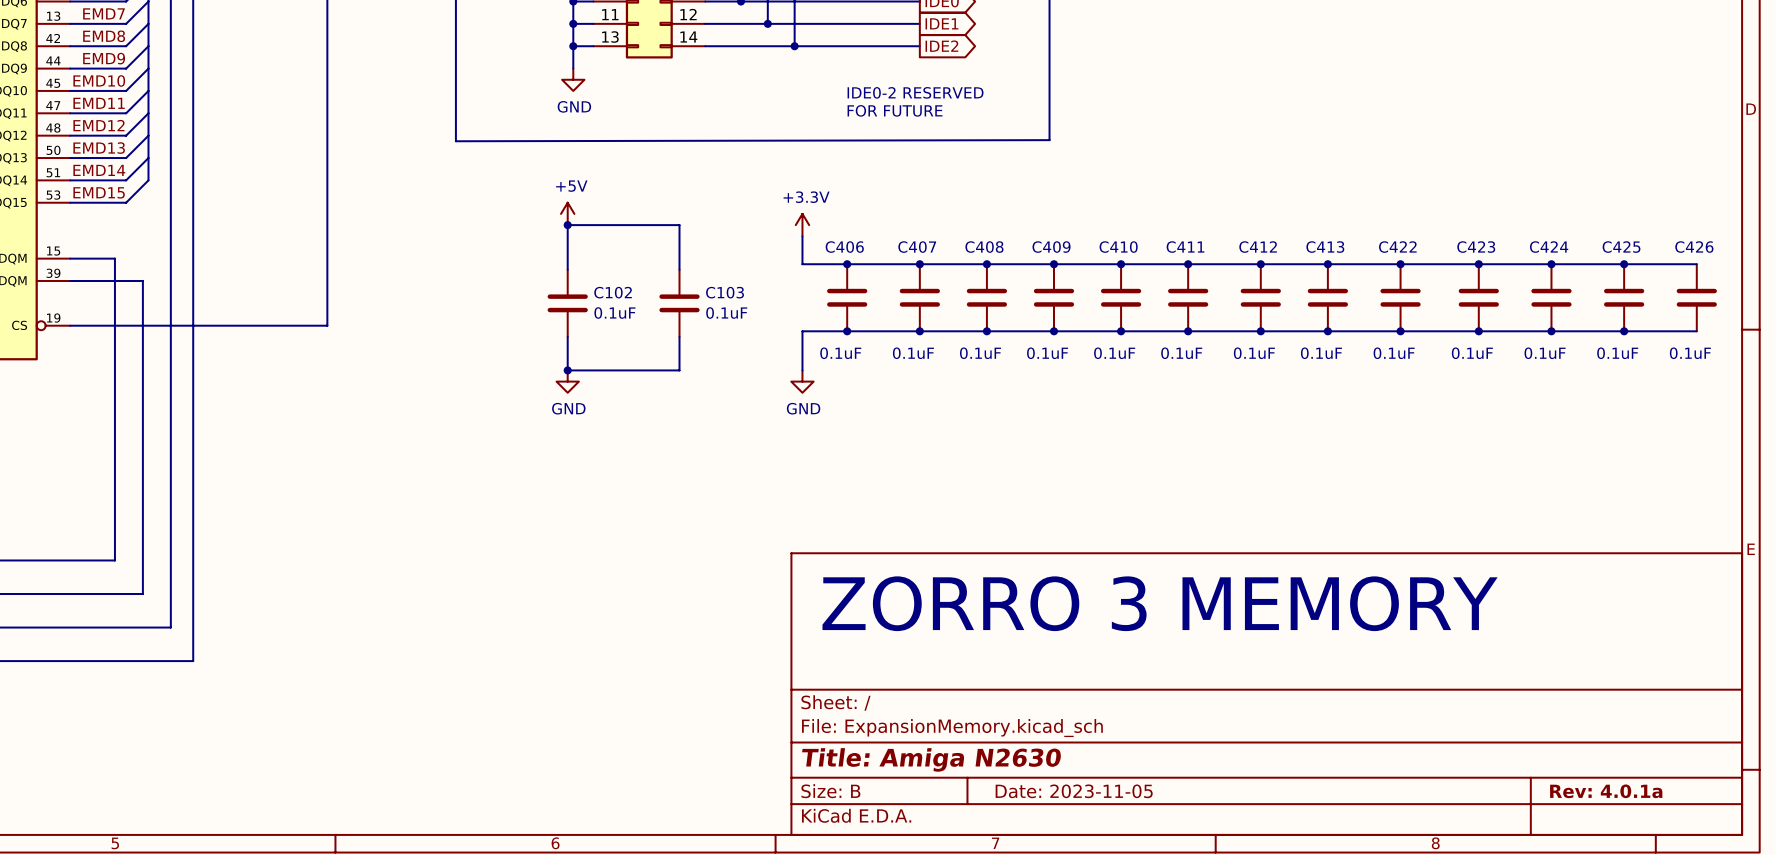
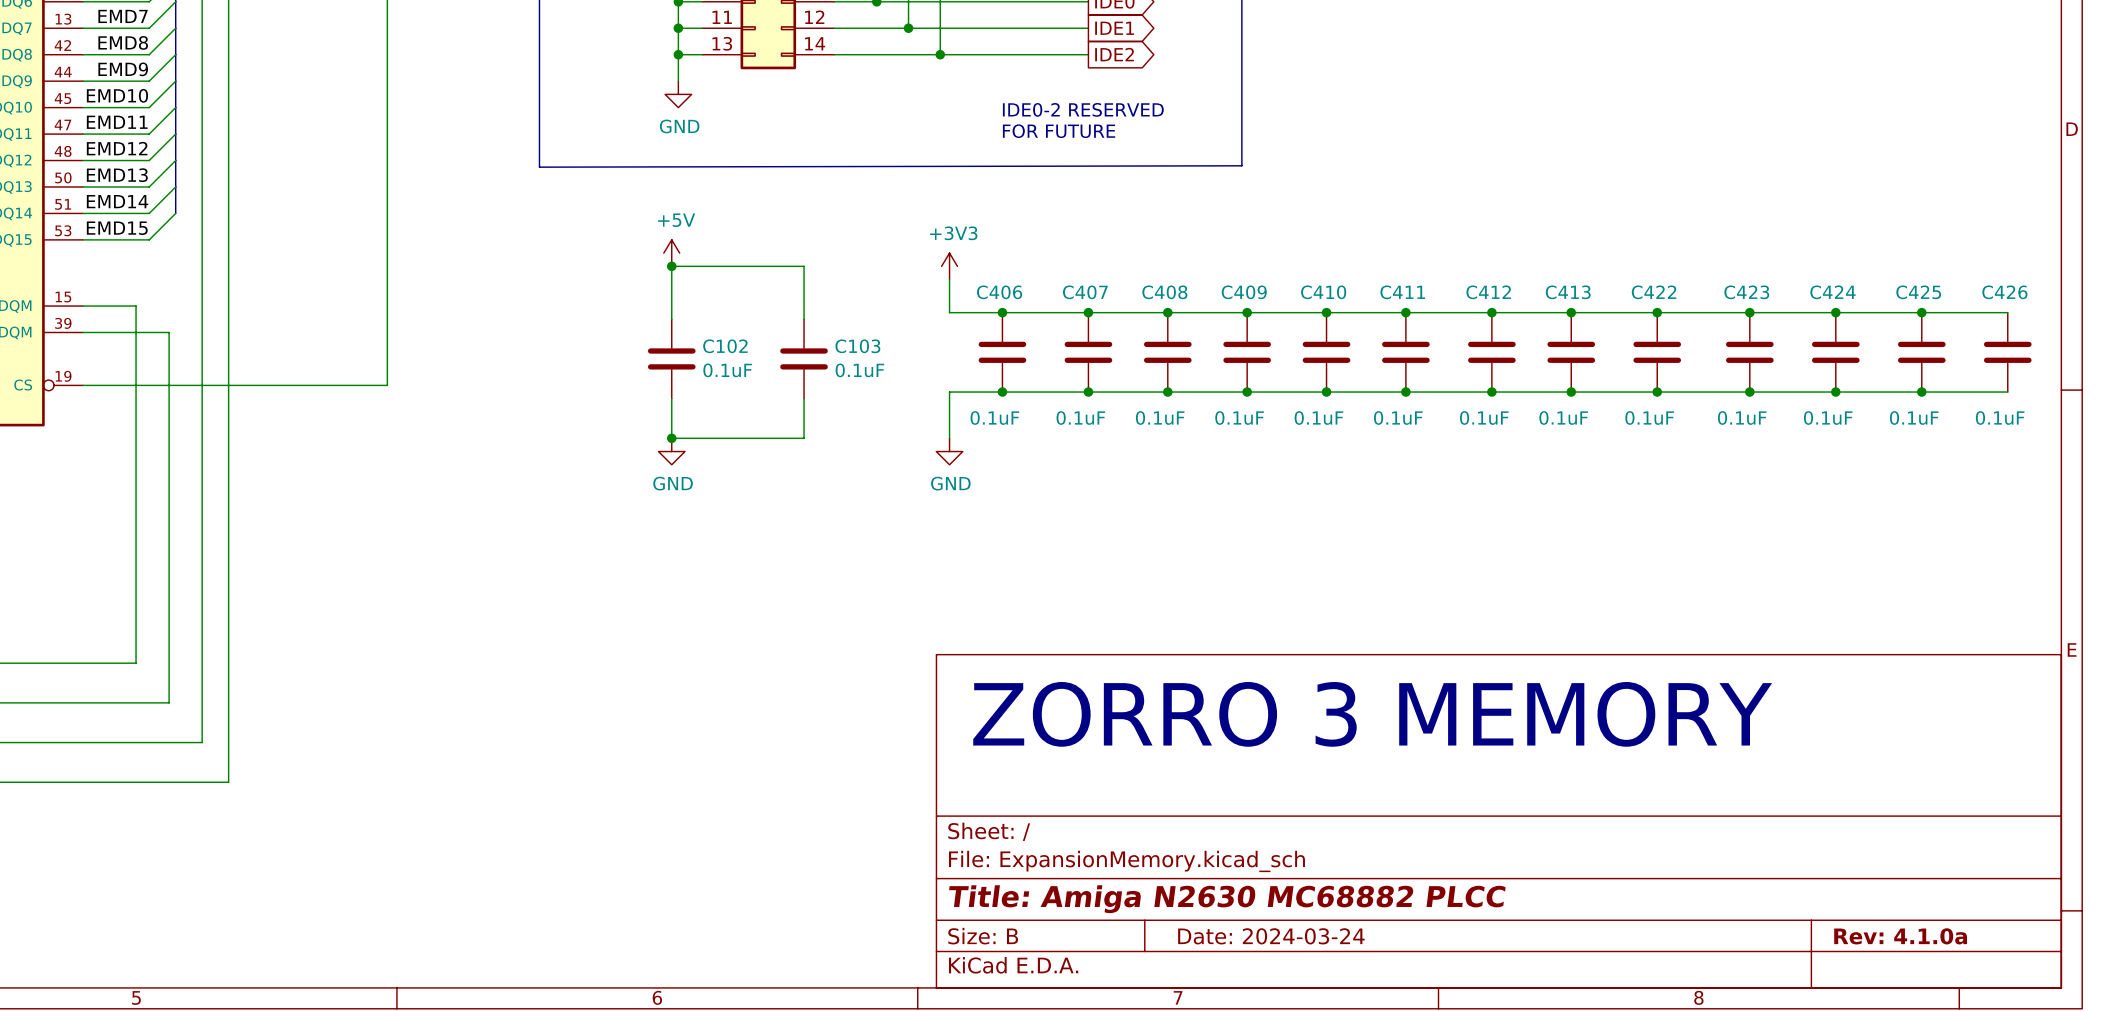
power symbol: +3.3V (802, 225) -> +3V3 (949, 266)
title block: Title: Amiga N2630 (931, 759) -> Title: Amiga N2630 MC68882 PLCC (1227, 899)
title block: Date: 2023-11-05 (1074, 791) -> Date: 2024-03-24 (1271, 936)
title block: Rev: 4.0.1a (1606, 791) -> Rev: 4.1.0a (1900, 936)

